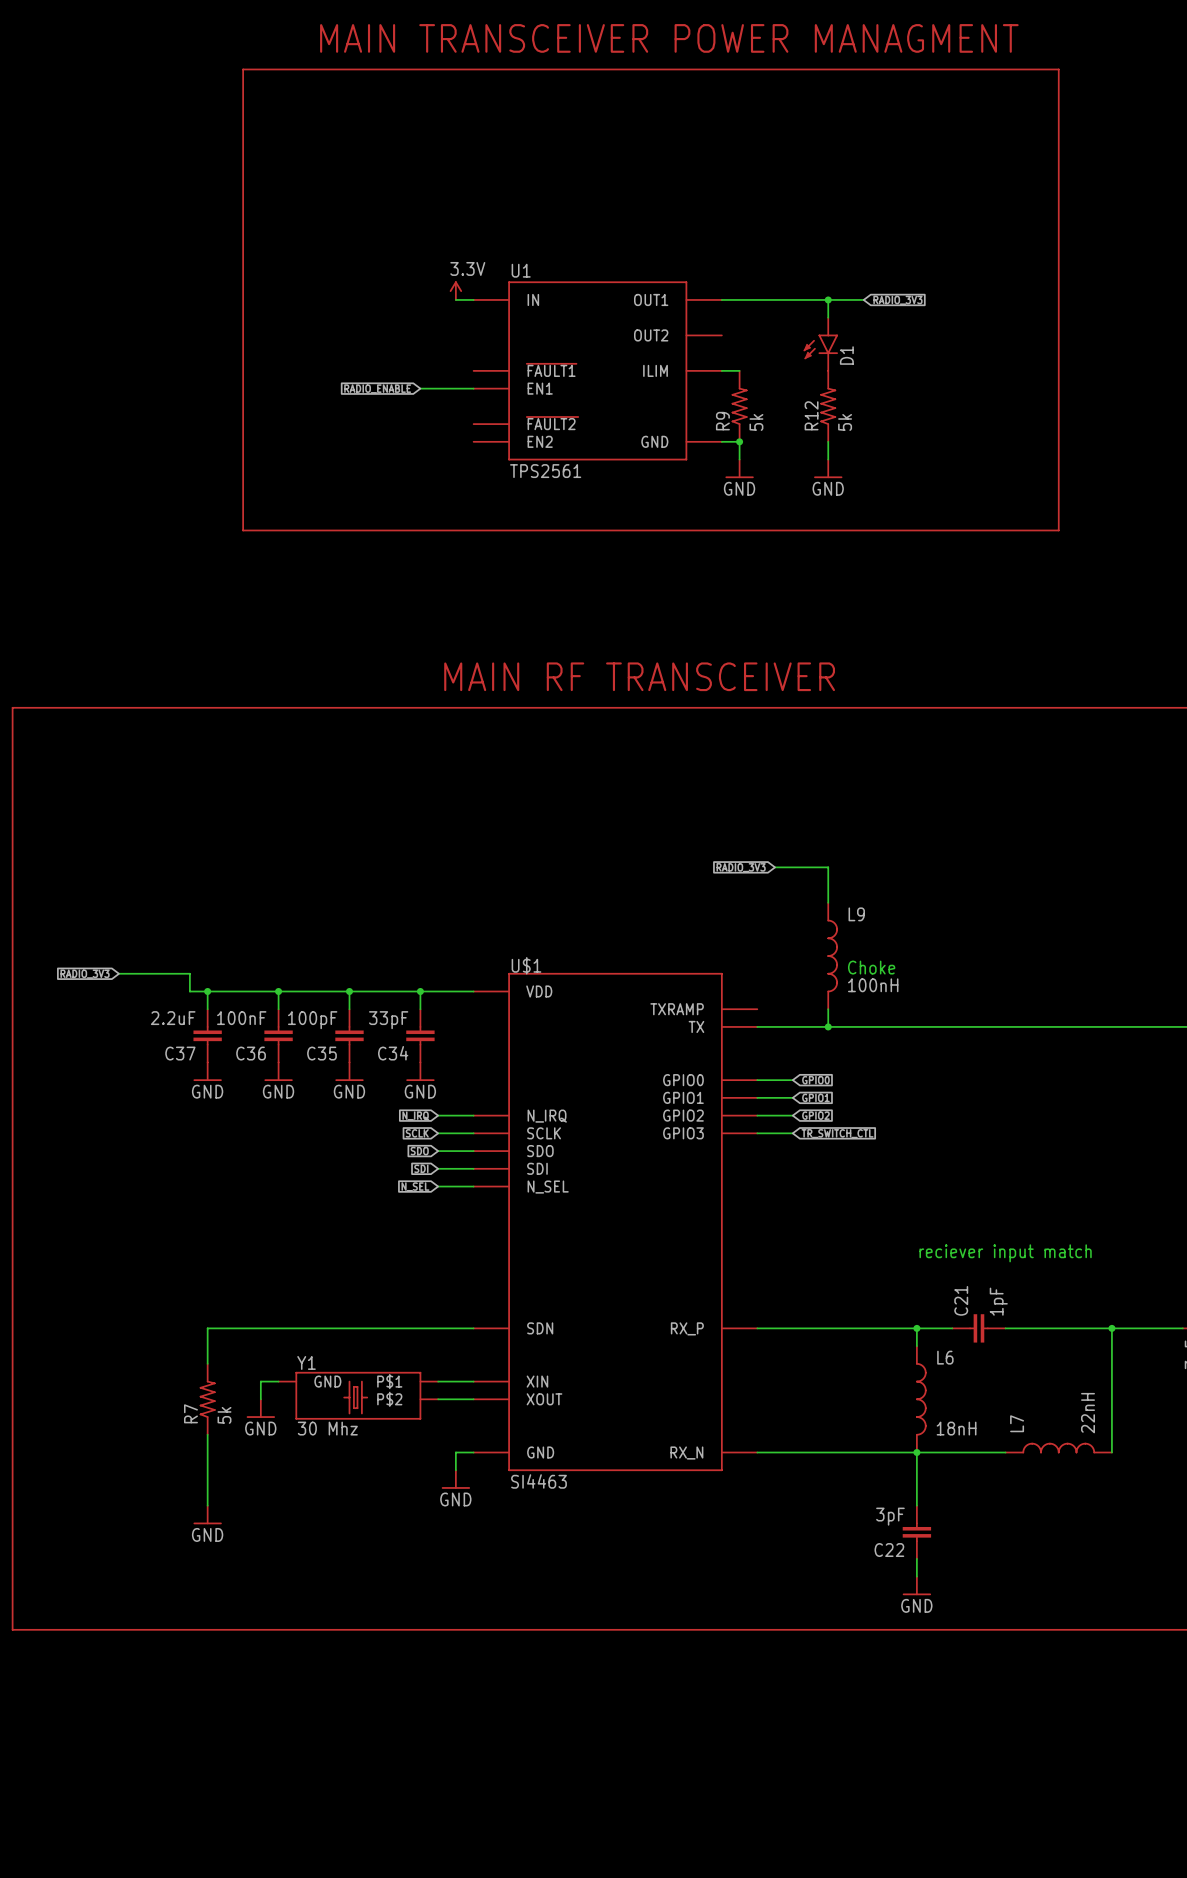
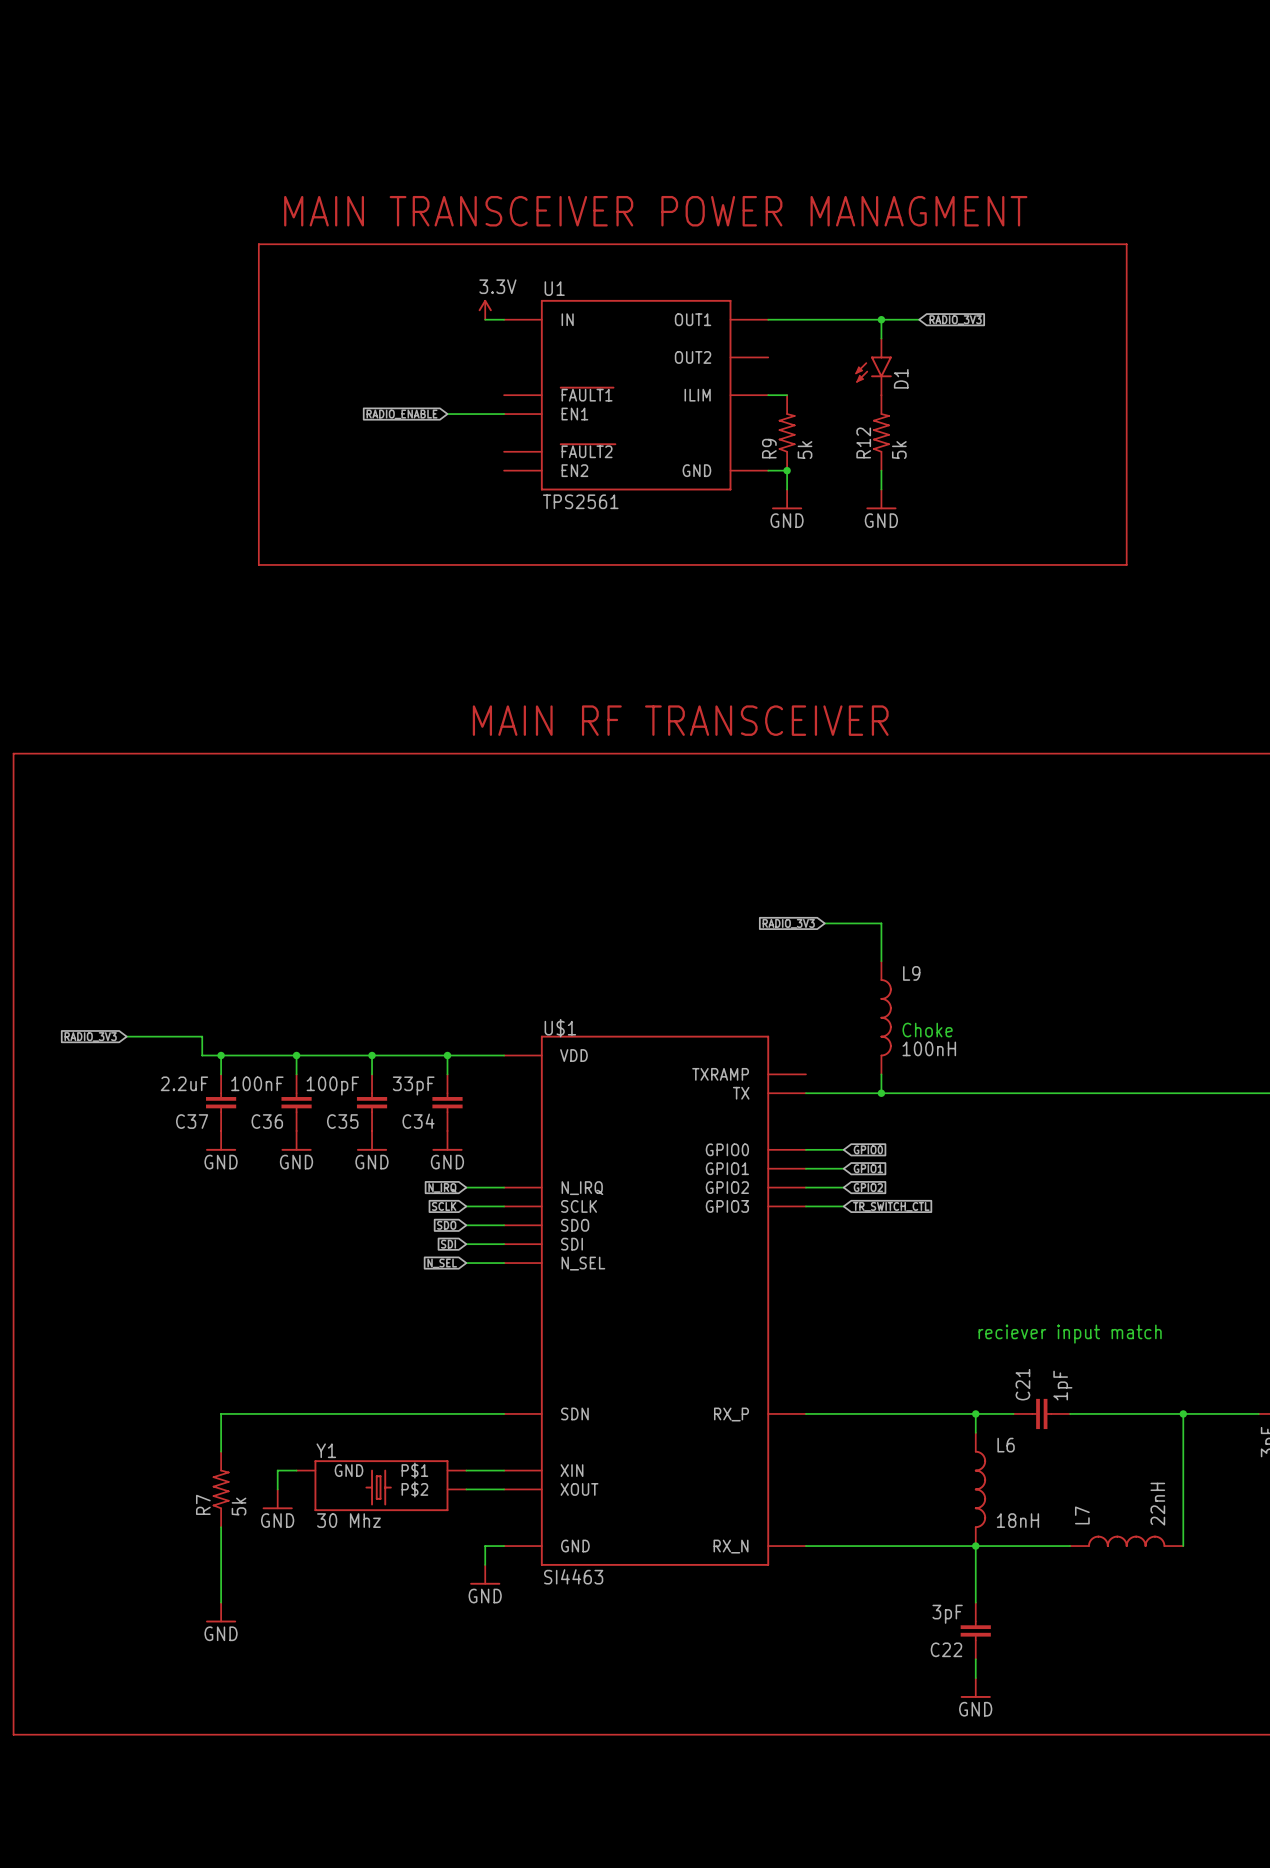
text position: MAIN TRANSCEIVER POWER MANAGMENT (669, 38) -> MAIN TRANSCEIVER POWER MANAGMENT (655, 211)
line: (243, 229) (243, 69) (1058, 69) (1058, 229) -> (258, 244) (1126, 244)

